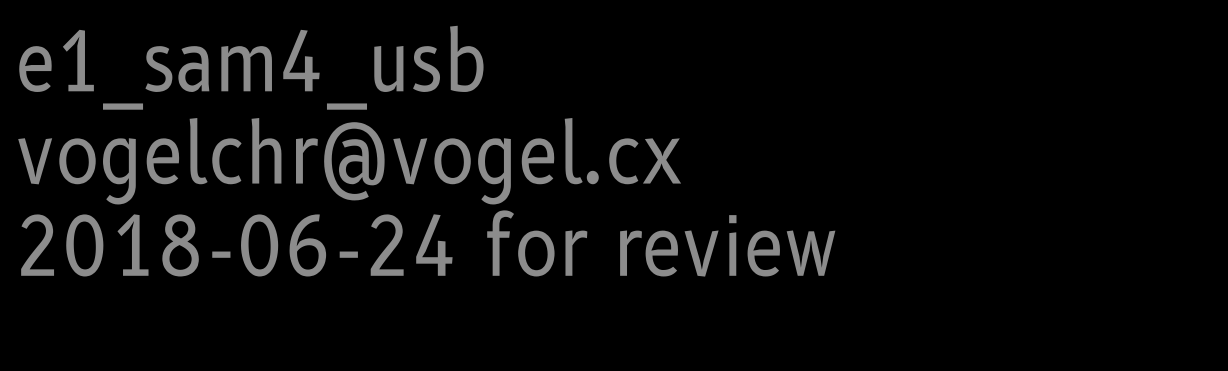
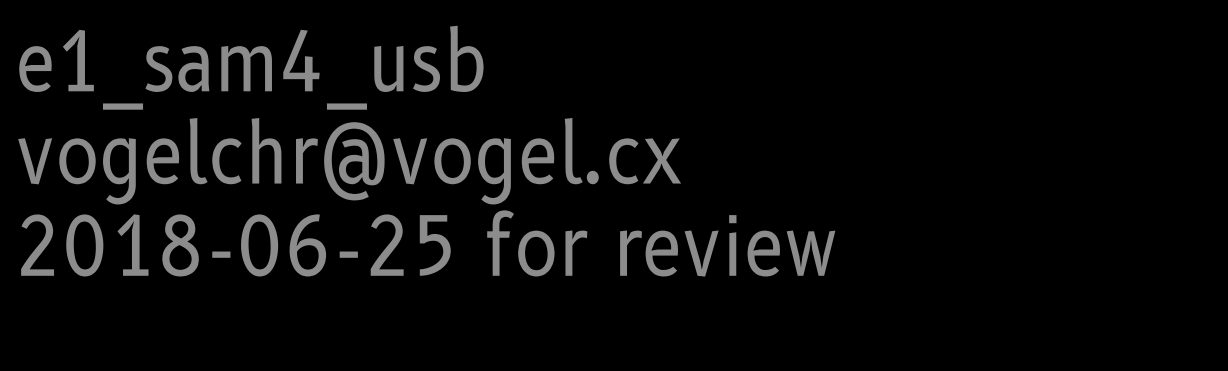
text: 2018-06-24 for review (428, 243) -> 2018-06-25 for review (428, 243)

